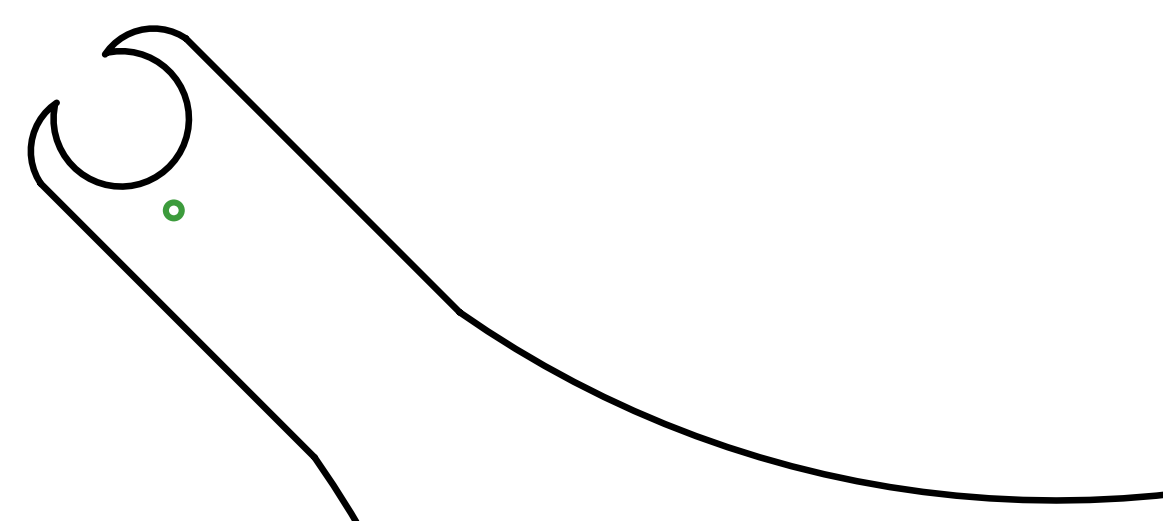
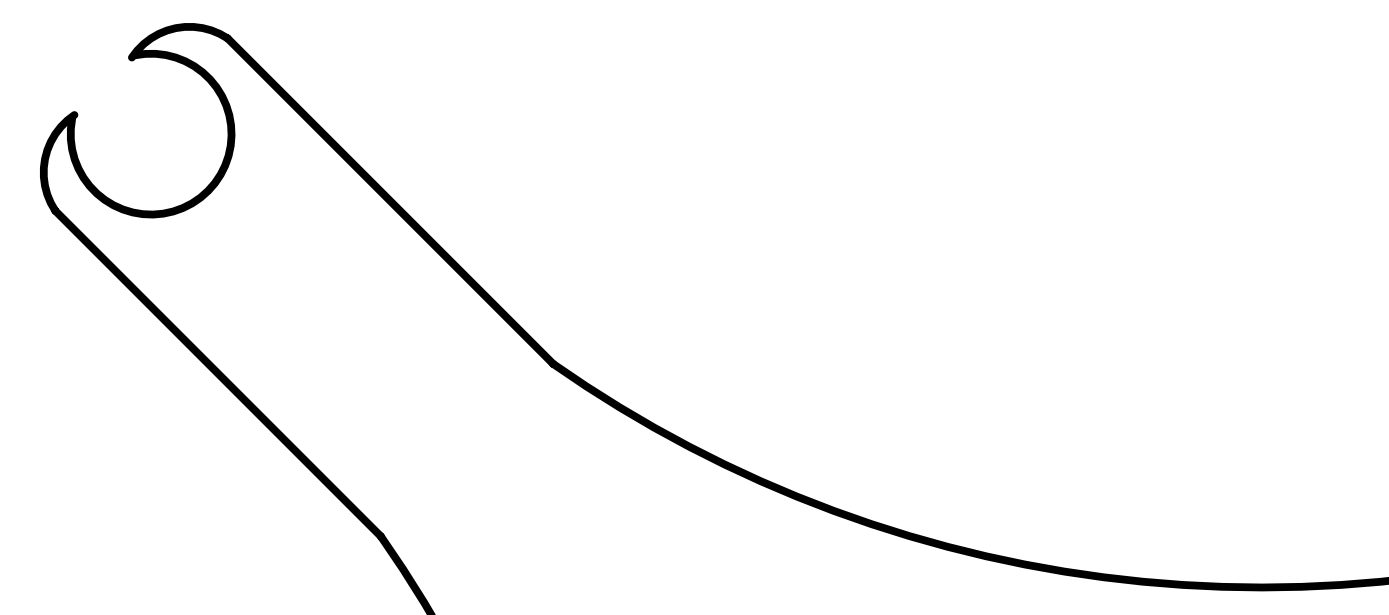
via: (173, 210) -> none

